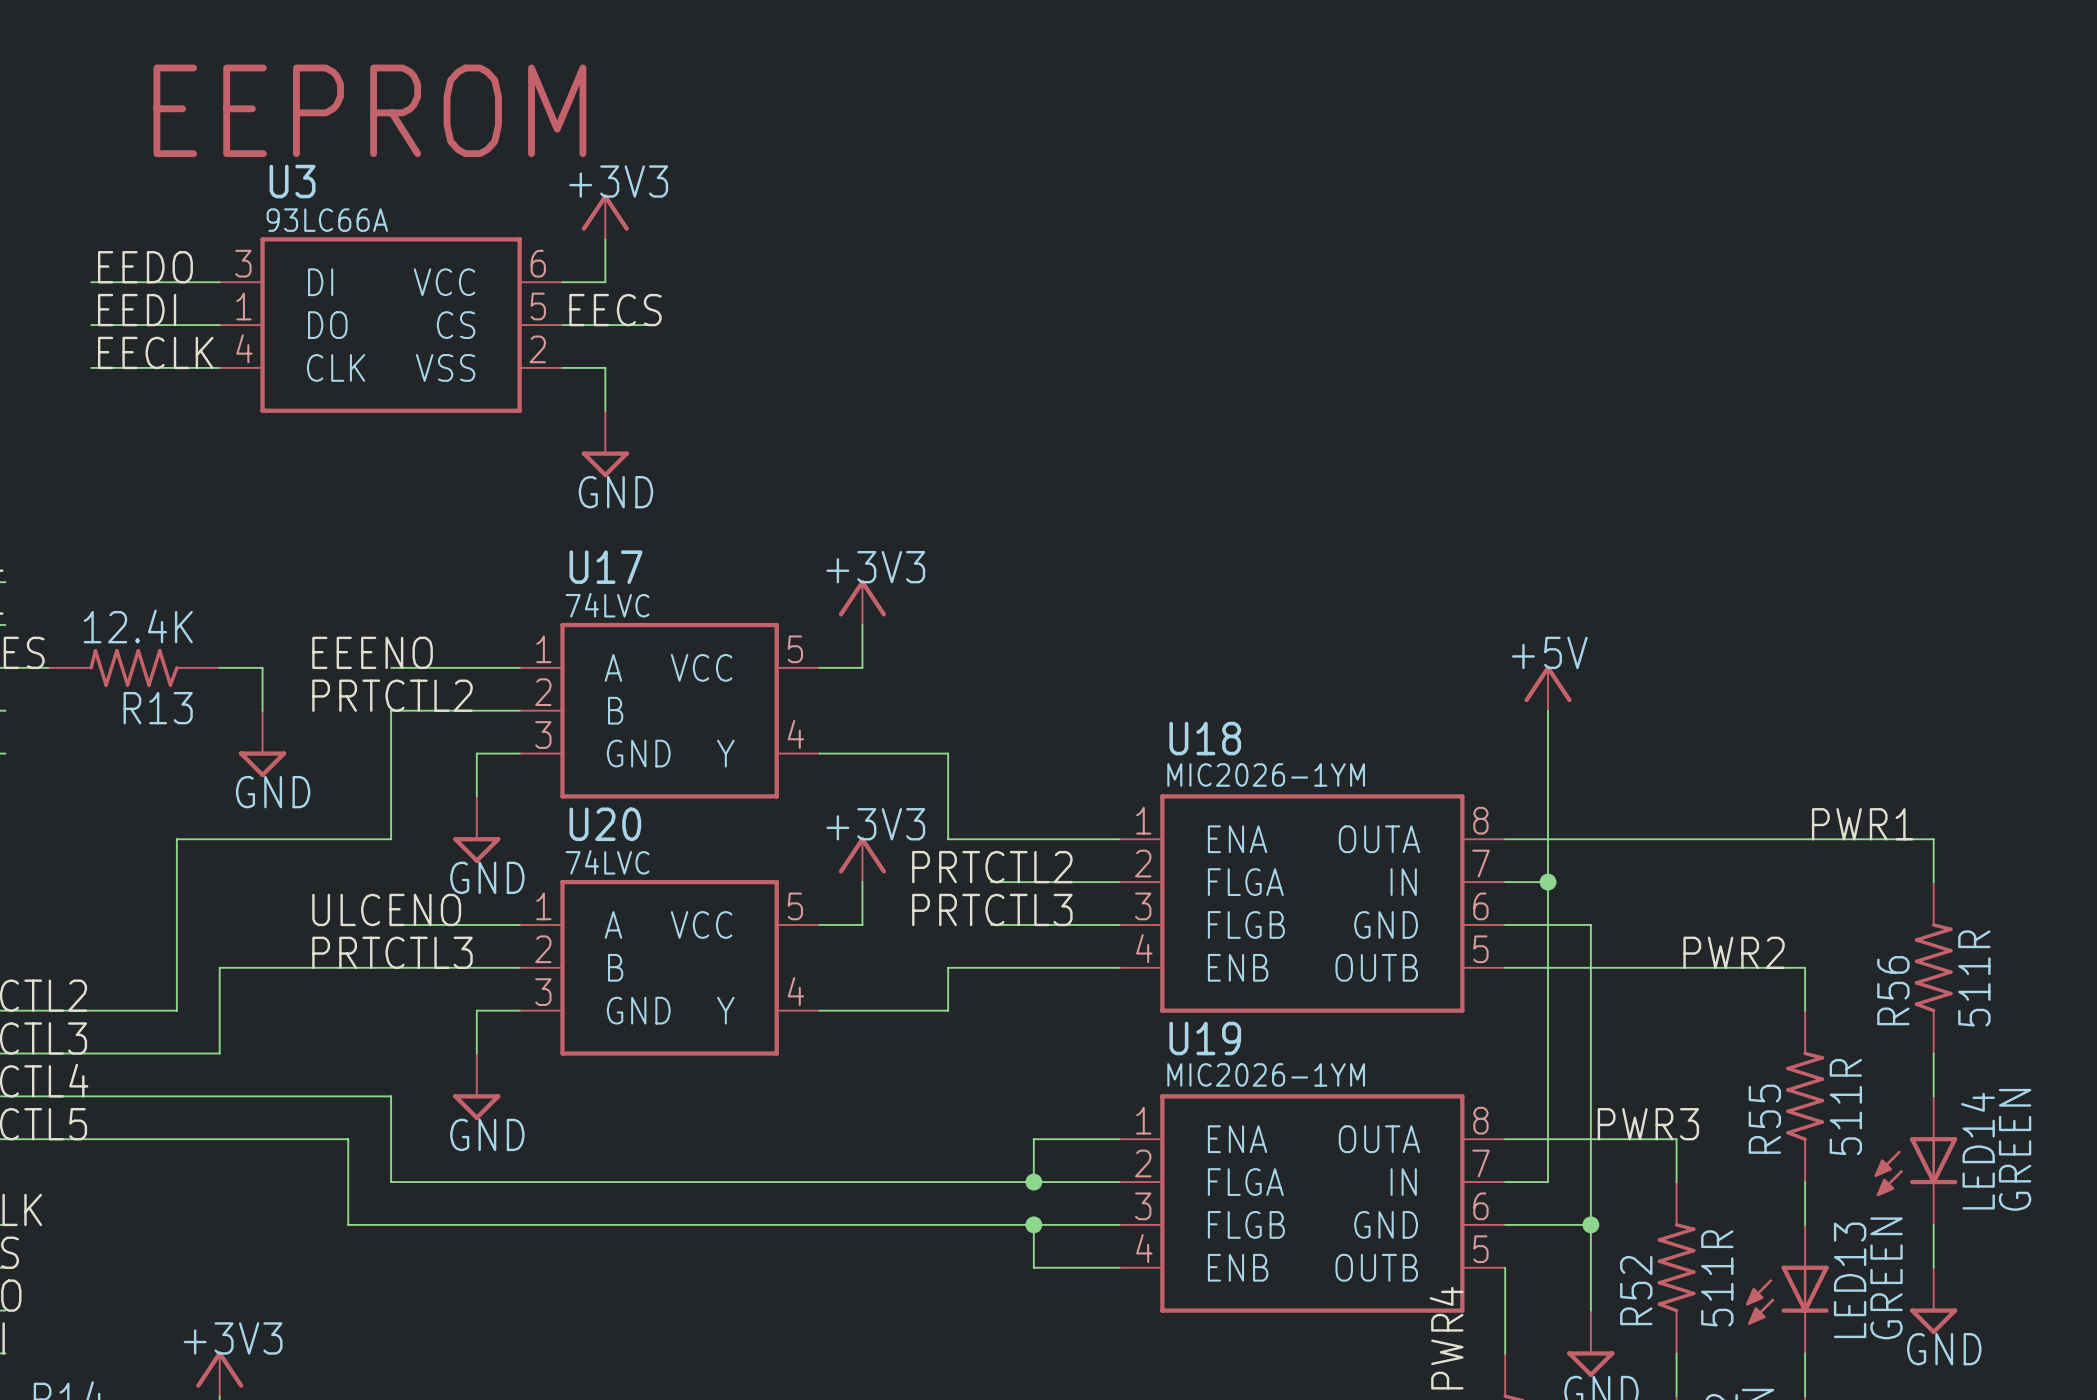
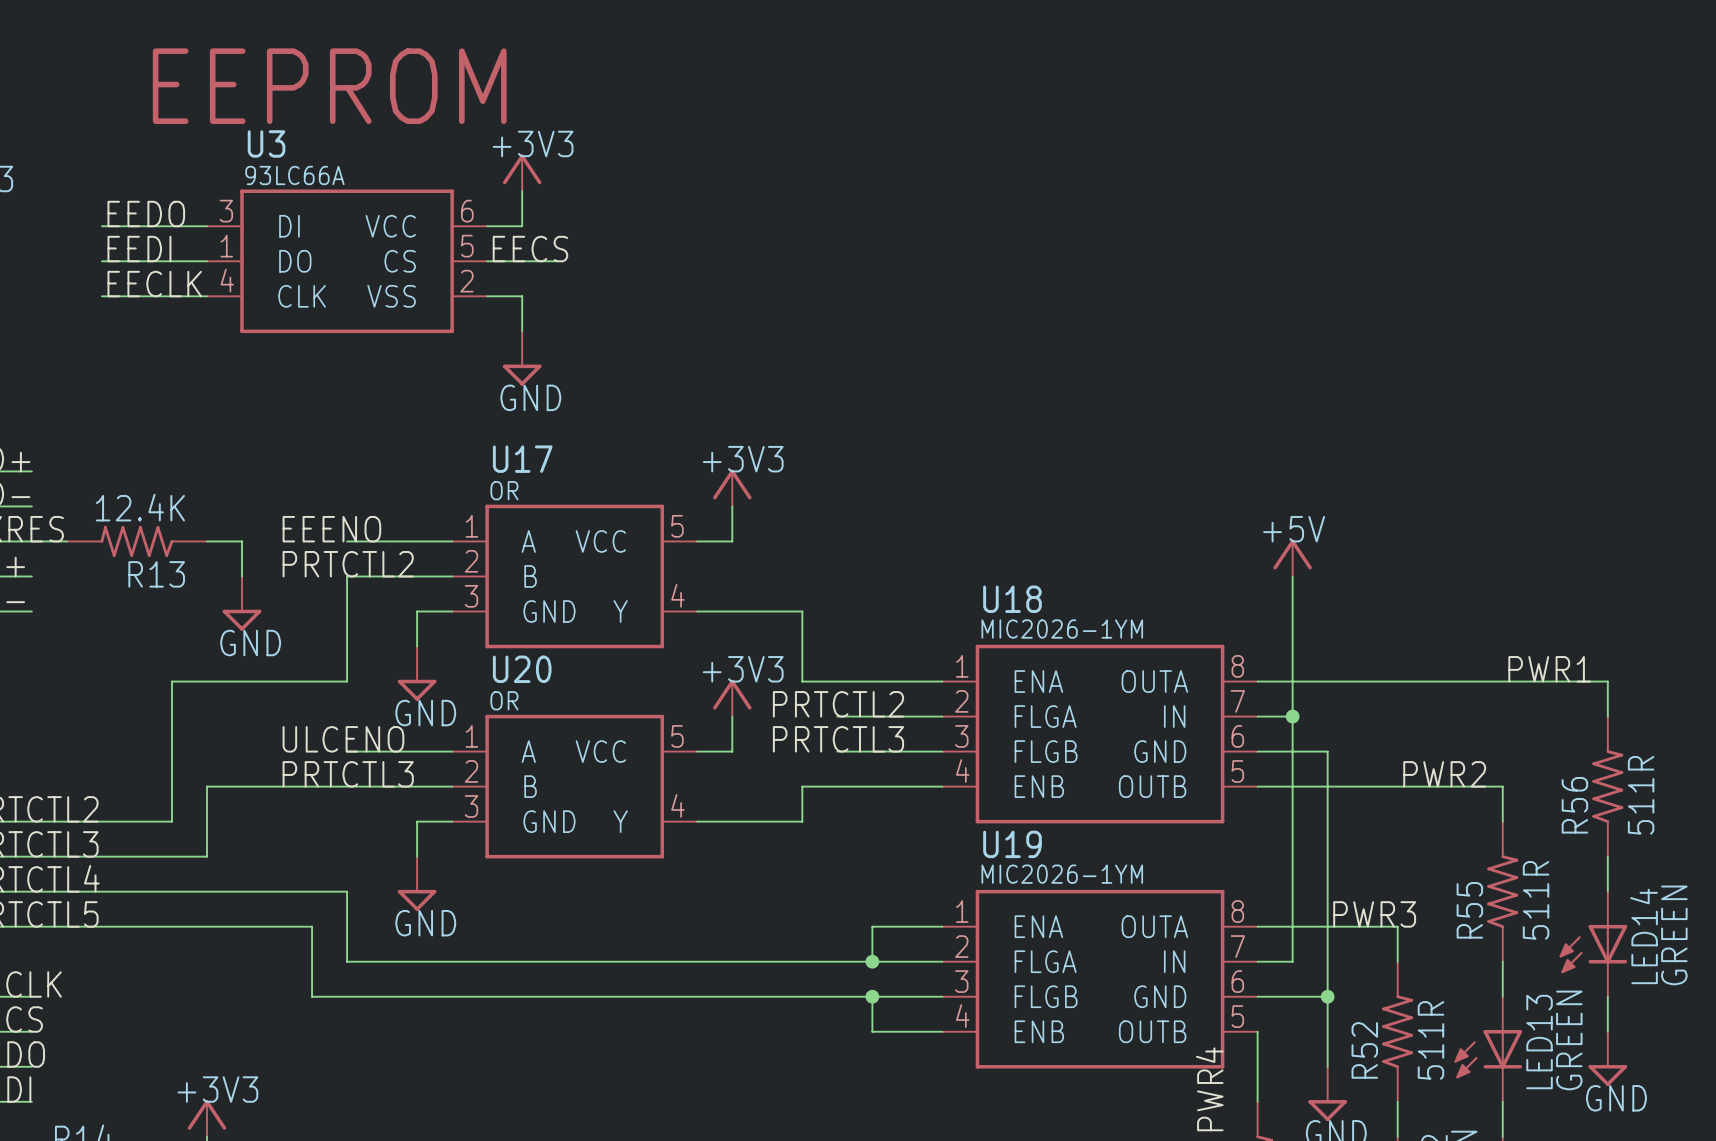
U17 value: 74LVC (607, 605) -> OR (504, 490)
U20 value: 74LVC (607, 862) -> OR (504, 700)

